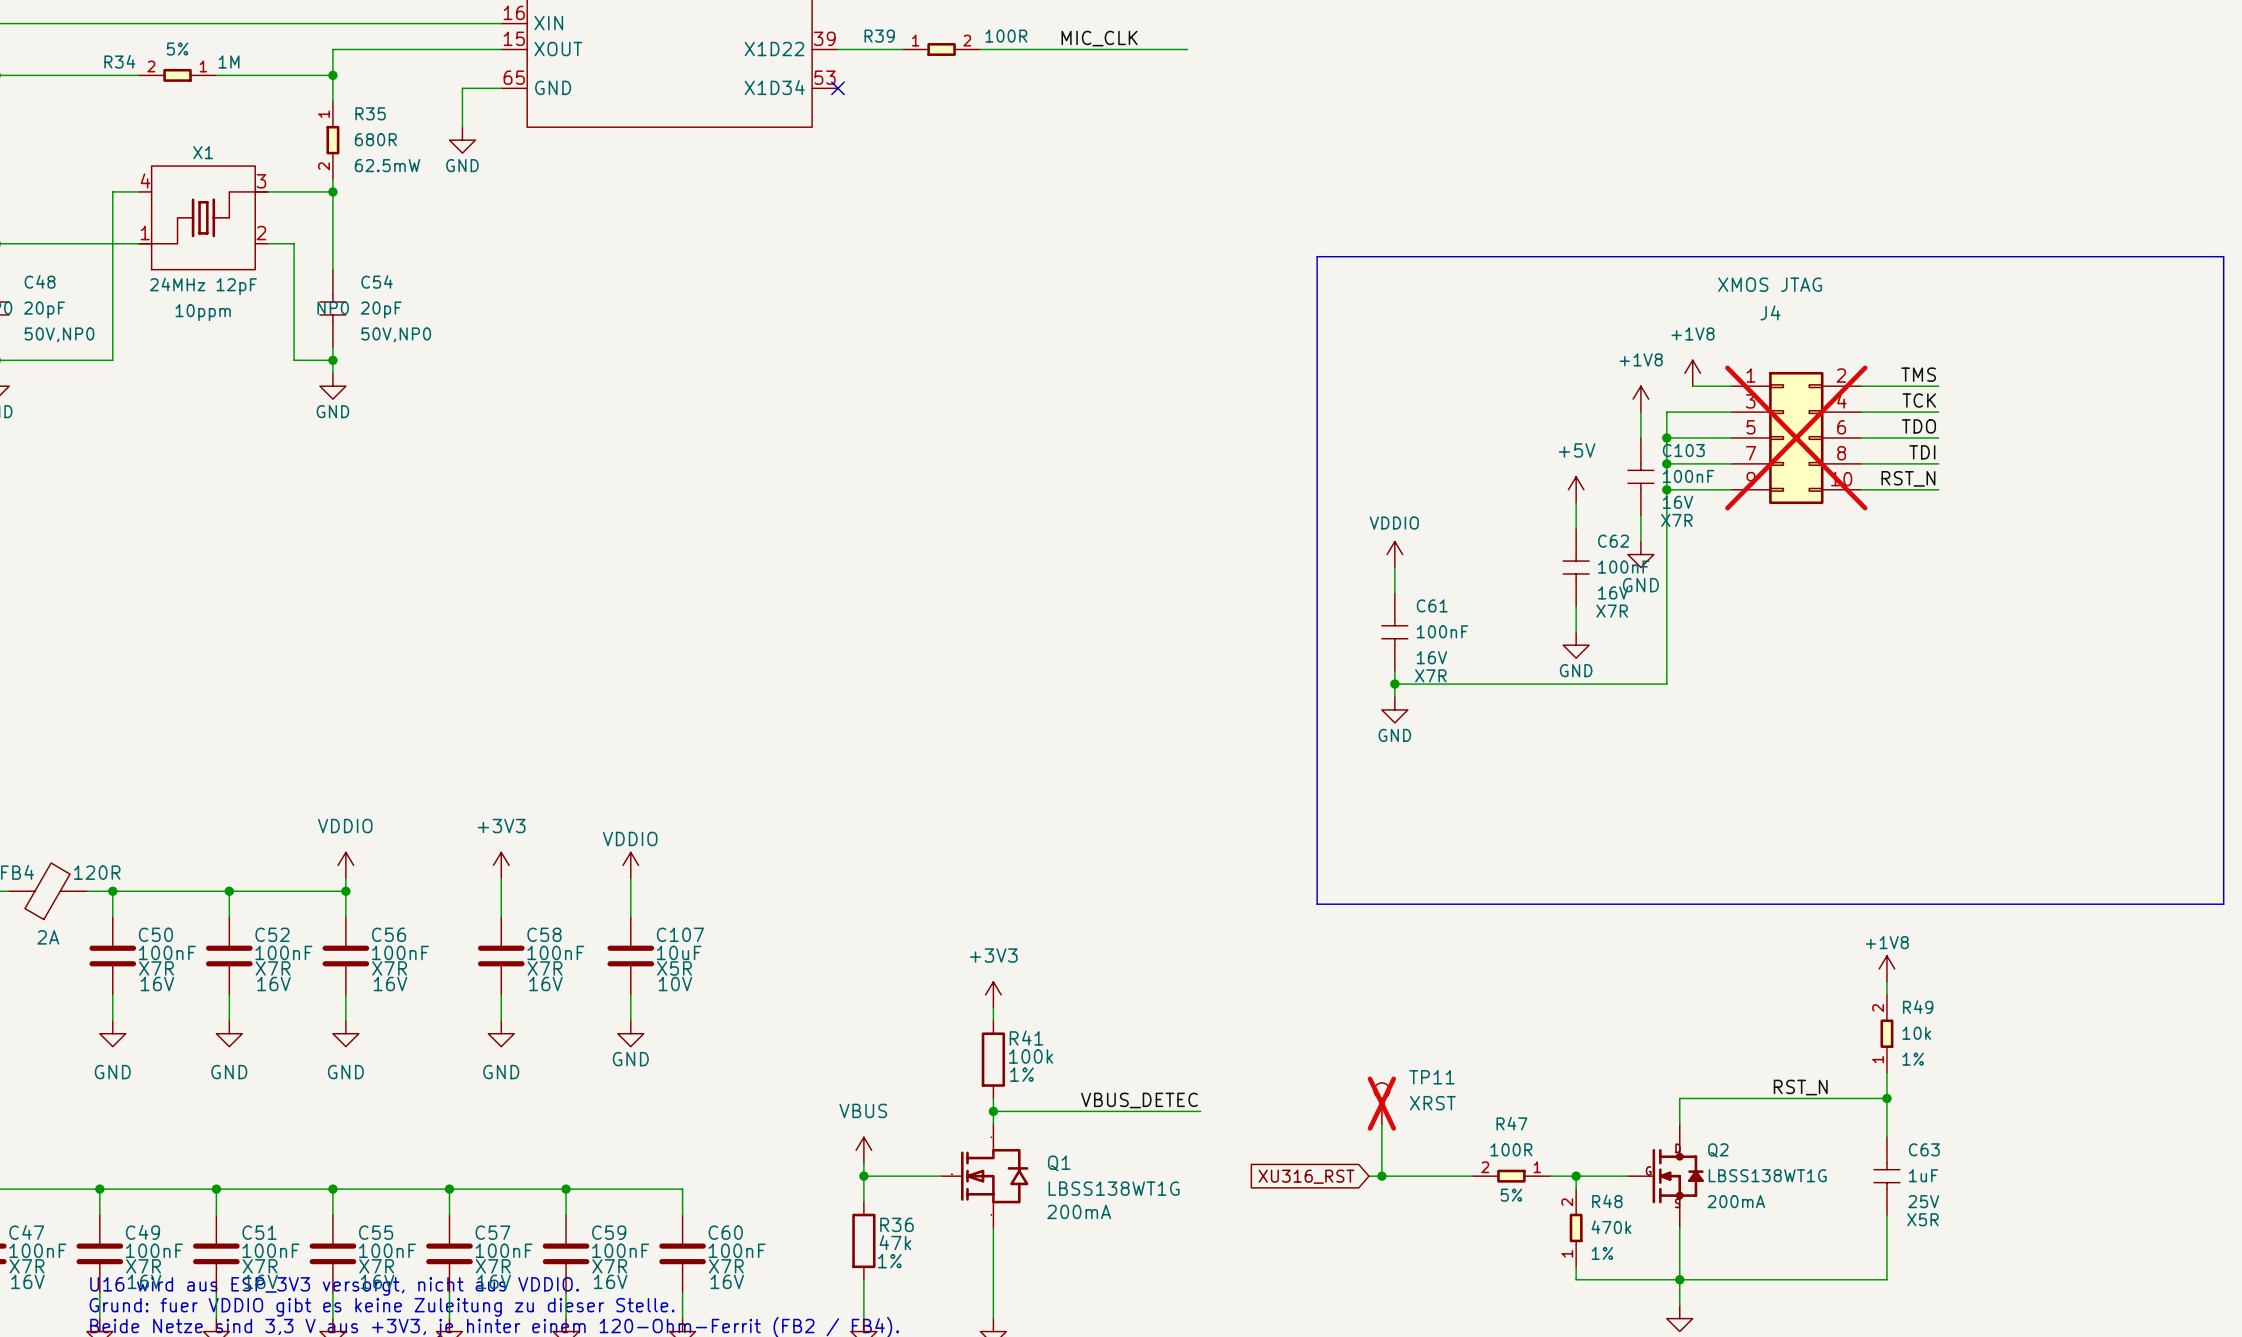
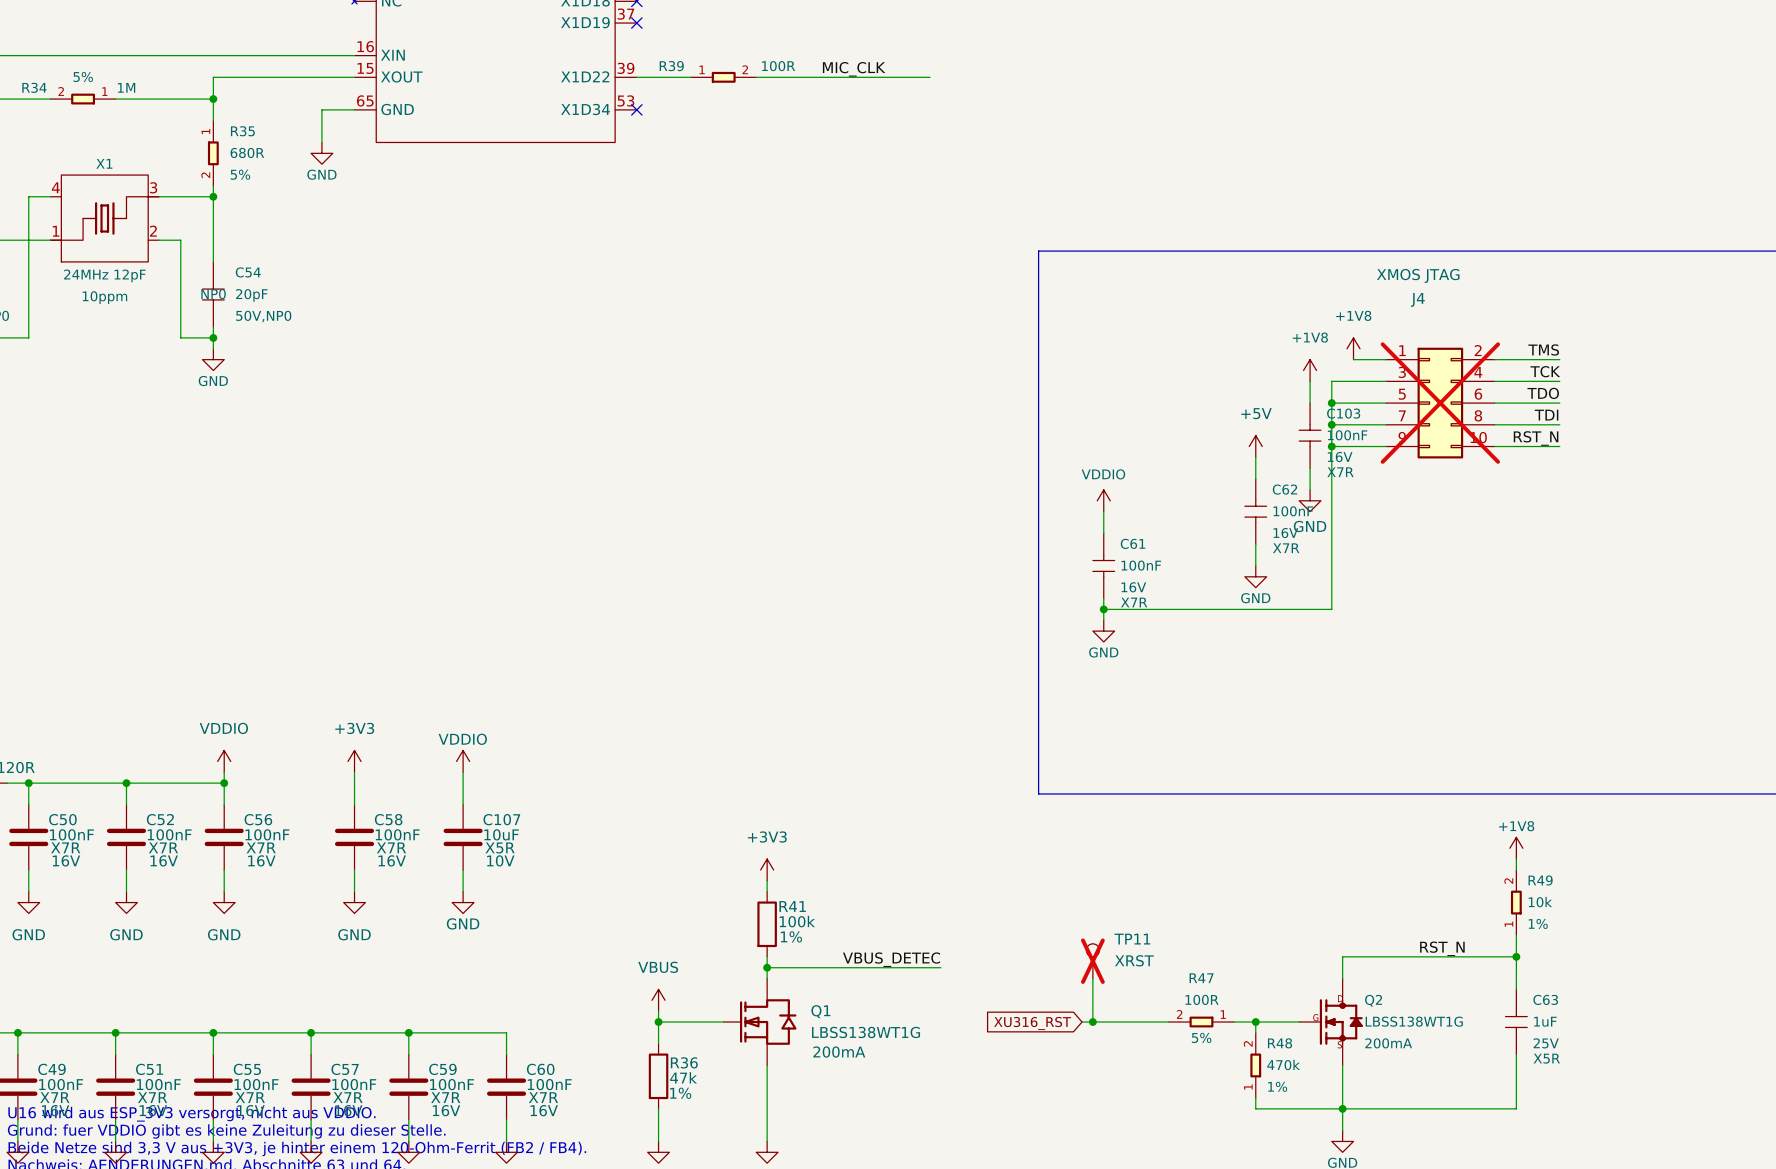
R35 text: 62.5mW (387, 165) -> 5% (240, 174)

